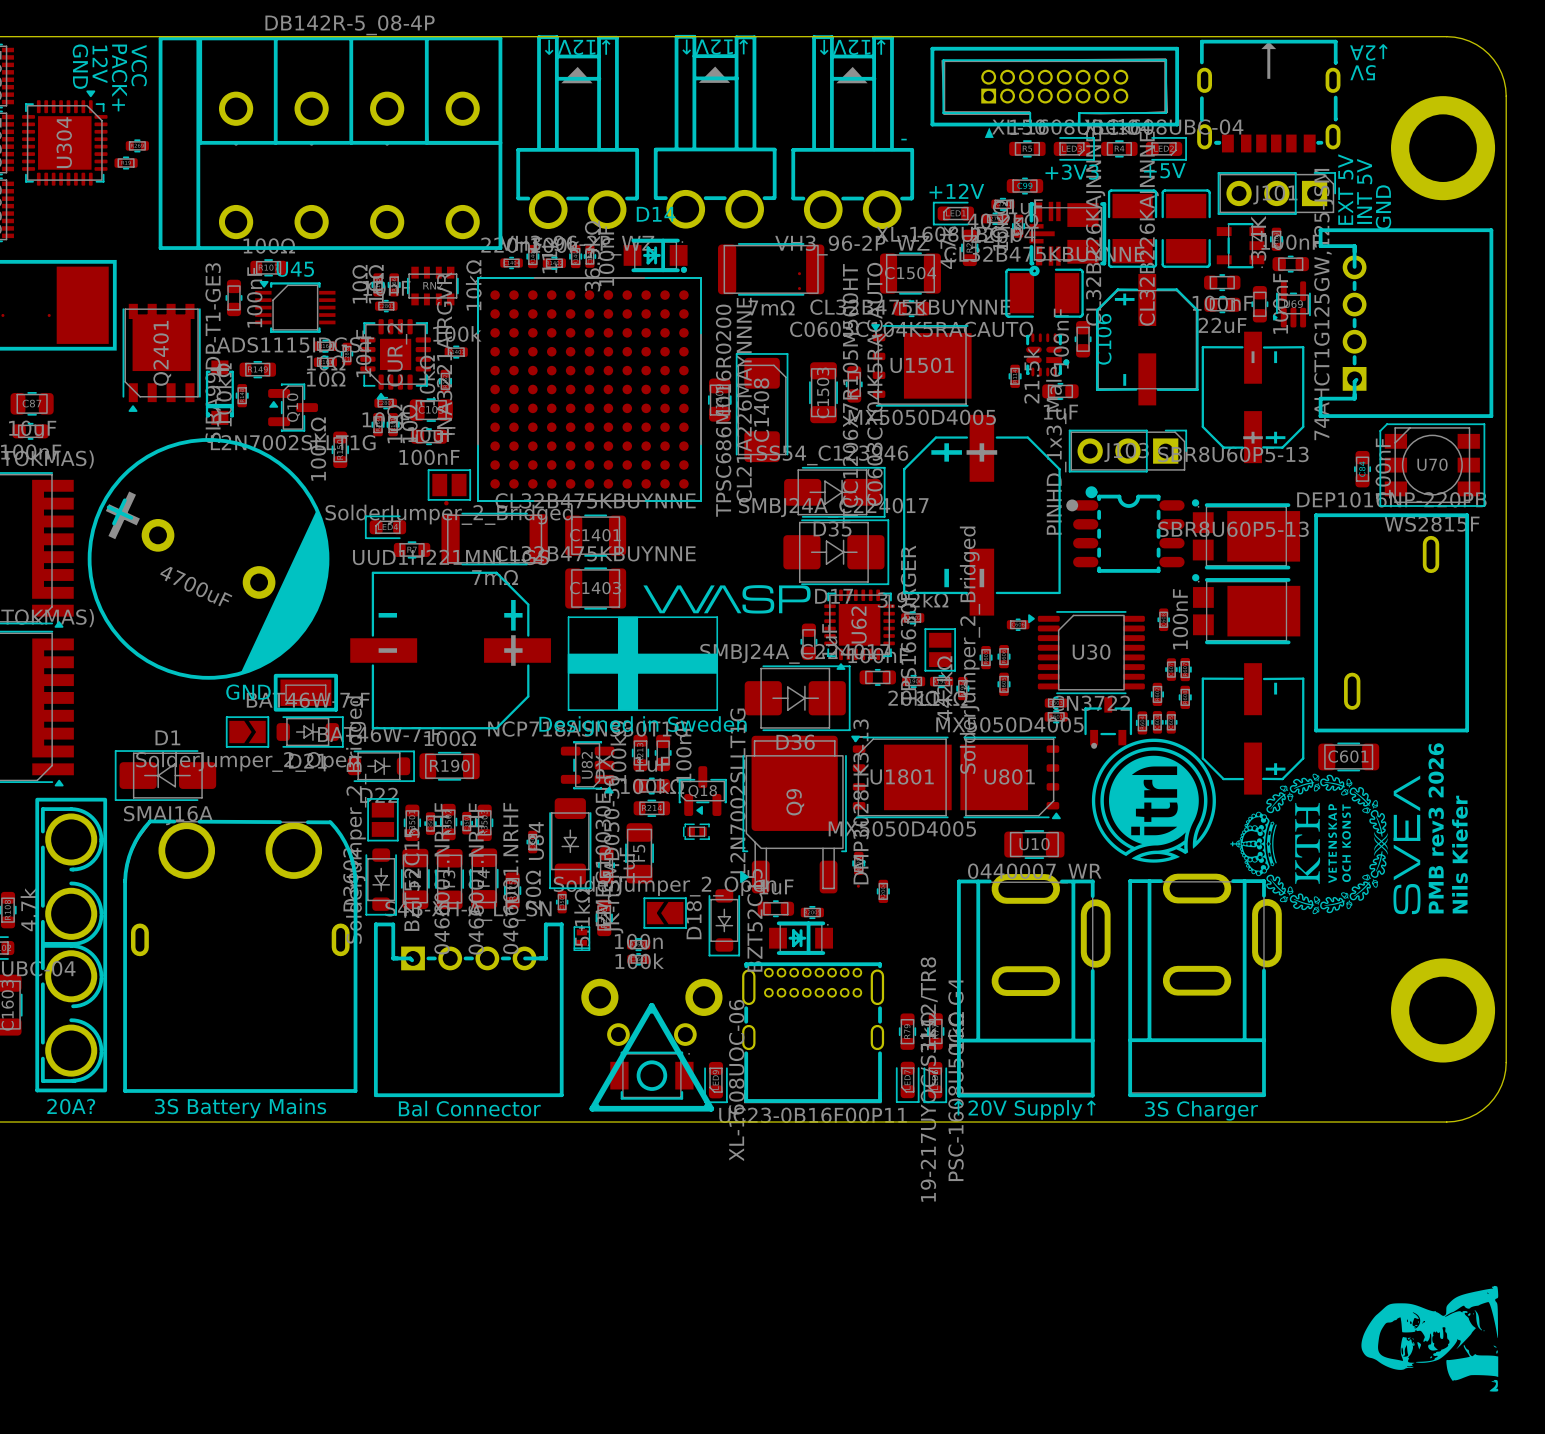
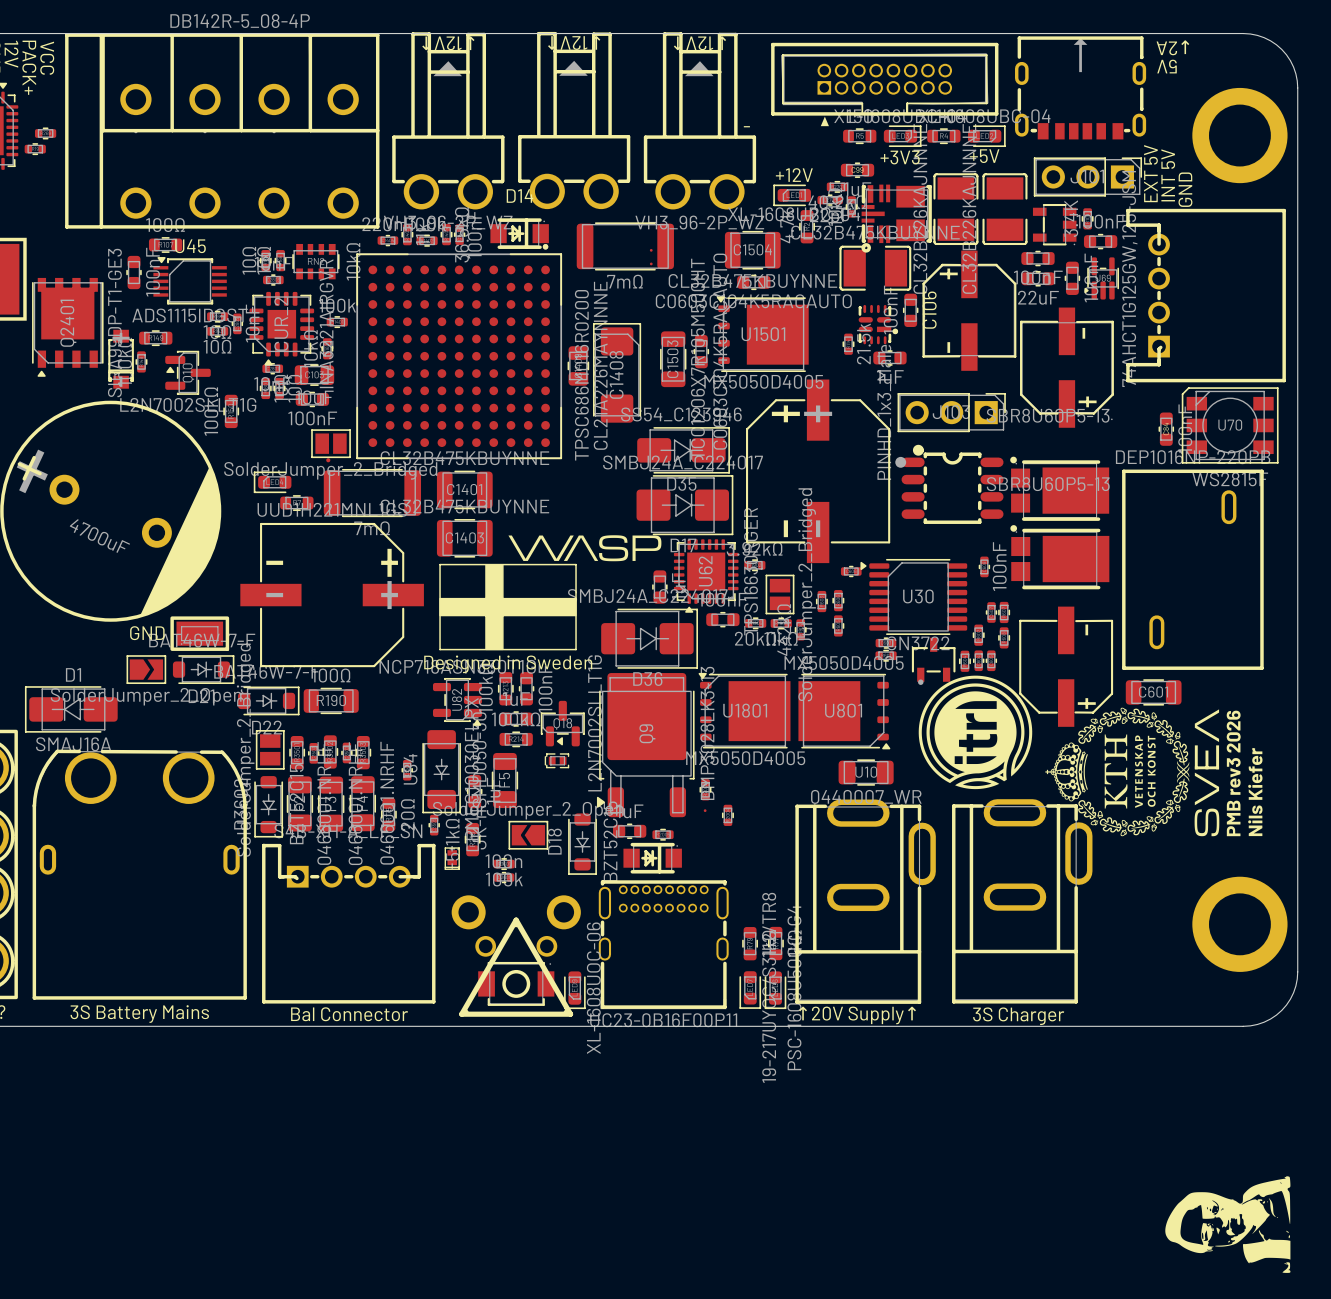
part footprint: [1201, 331, 1305, 464] -> [1020, 307, 1114, 428]

